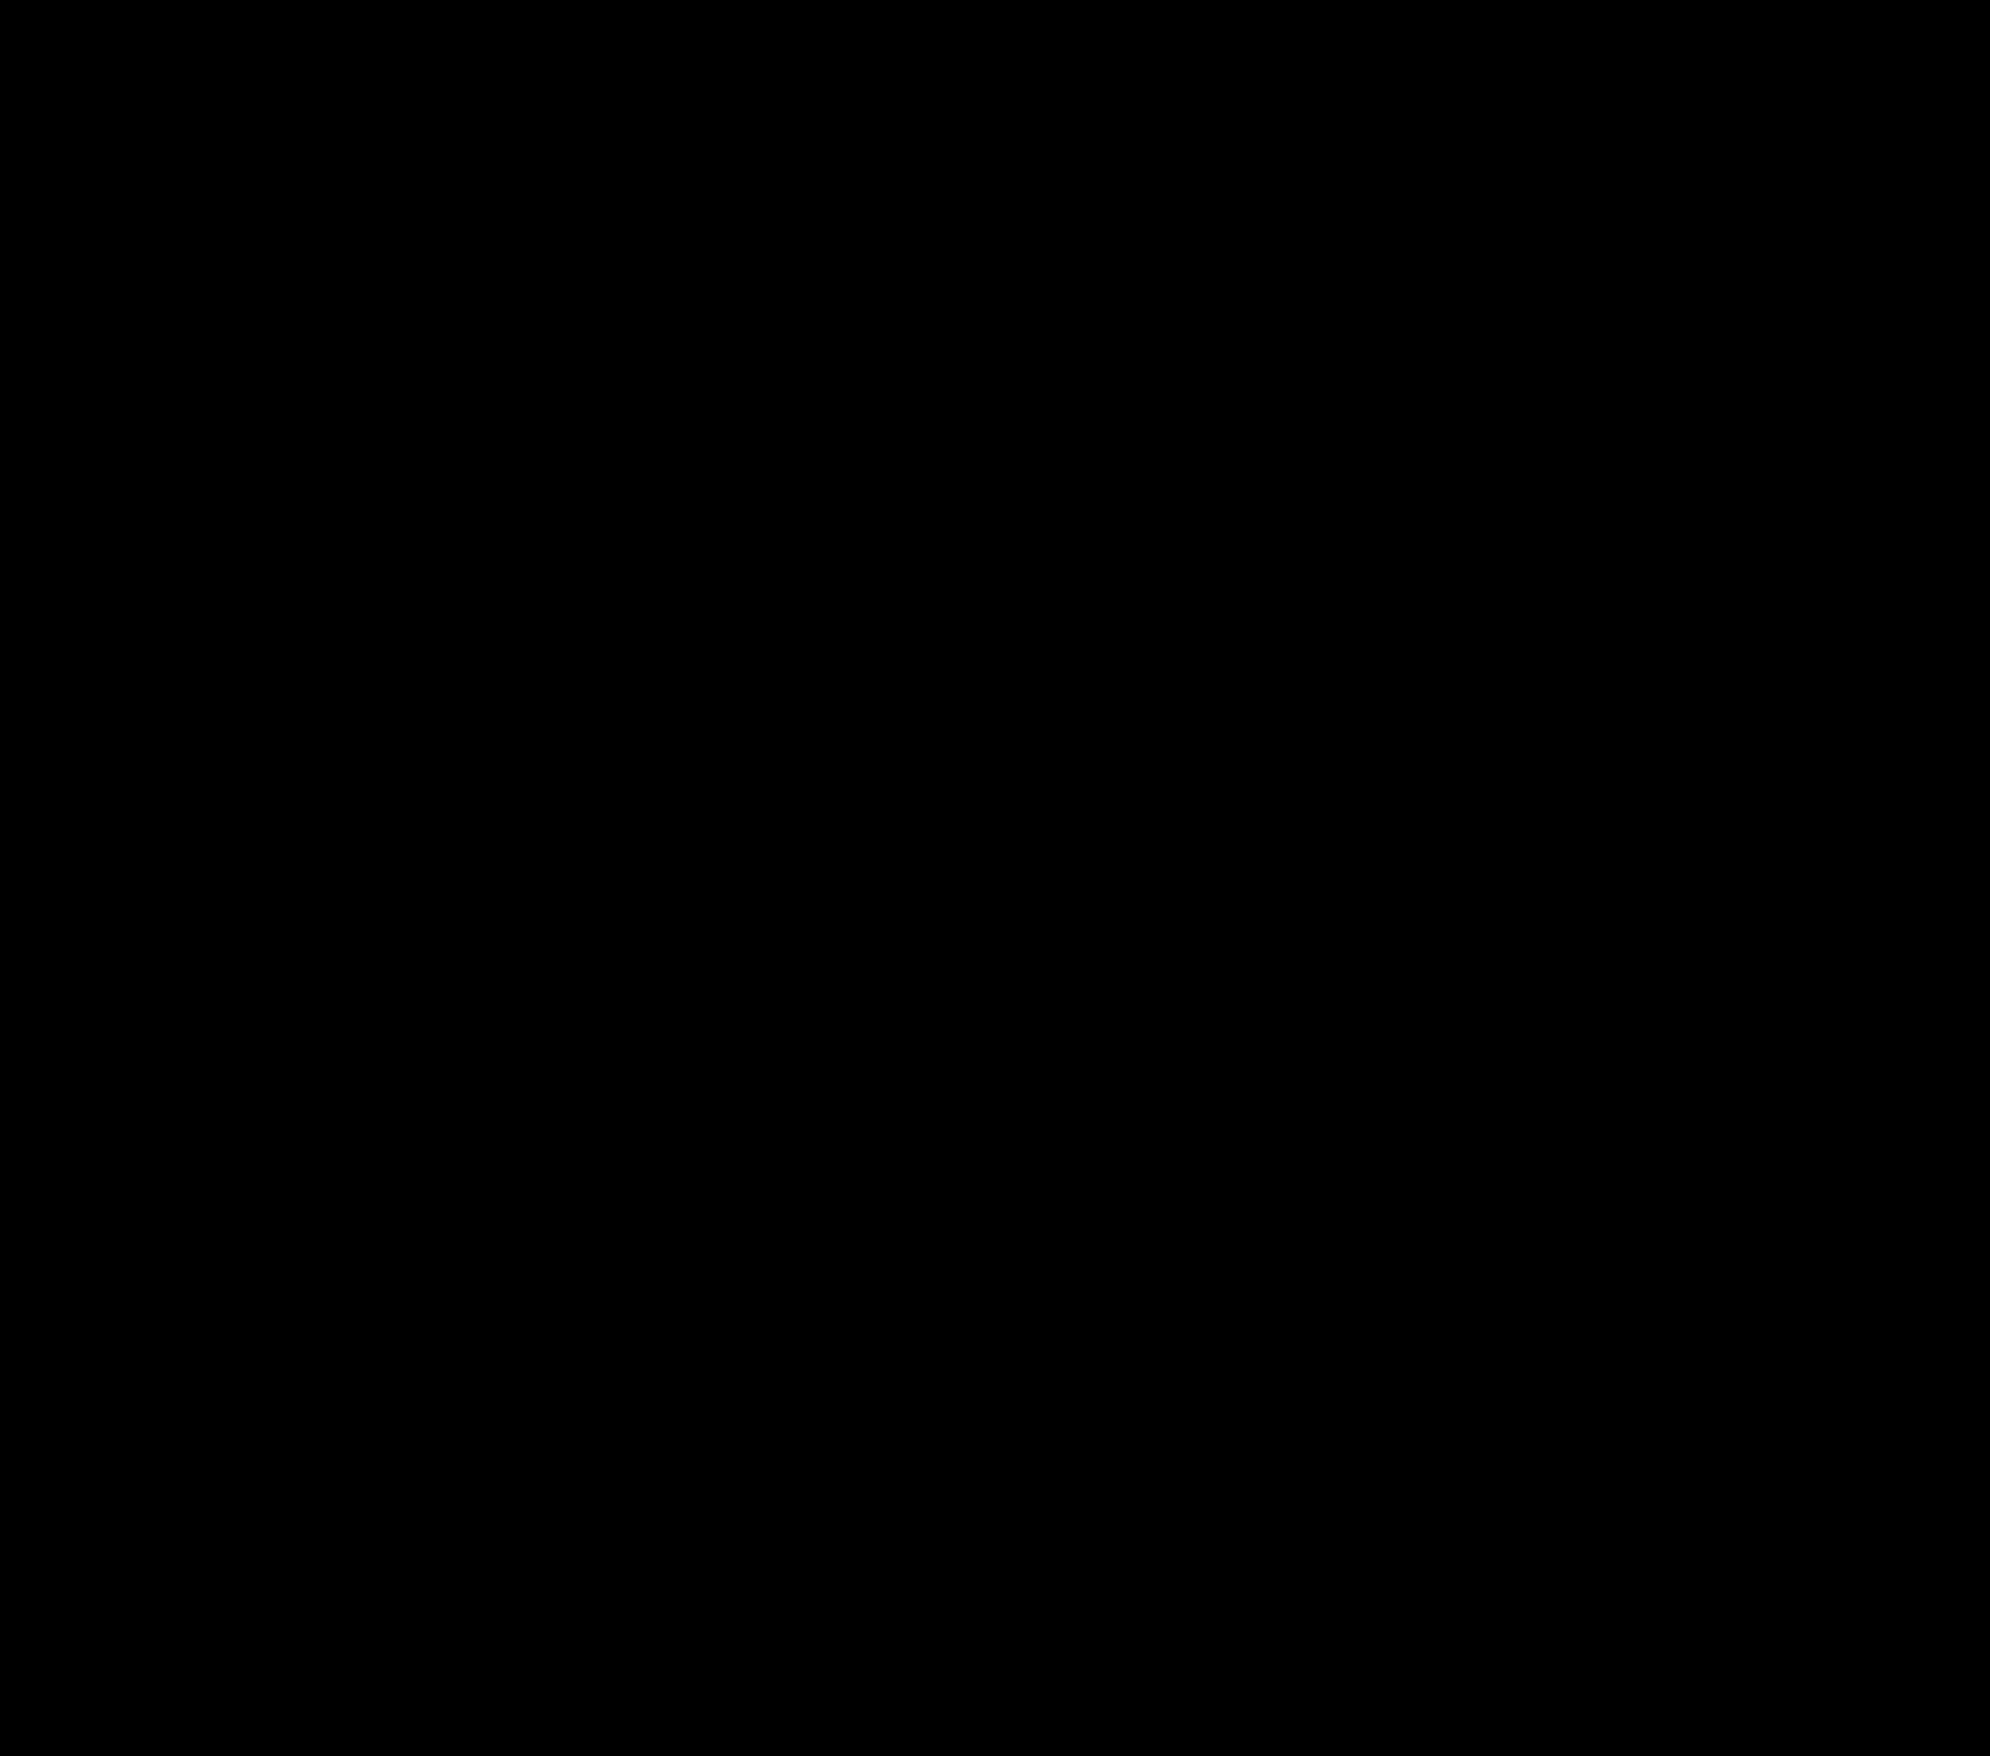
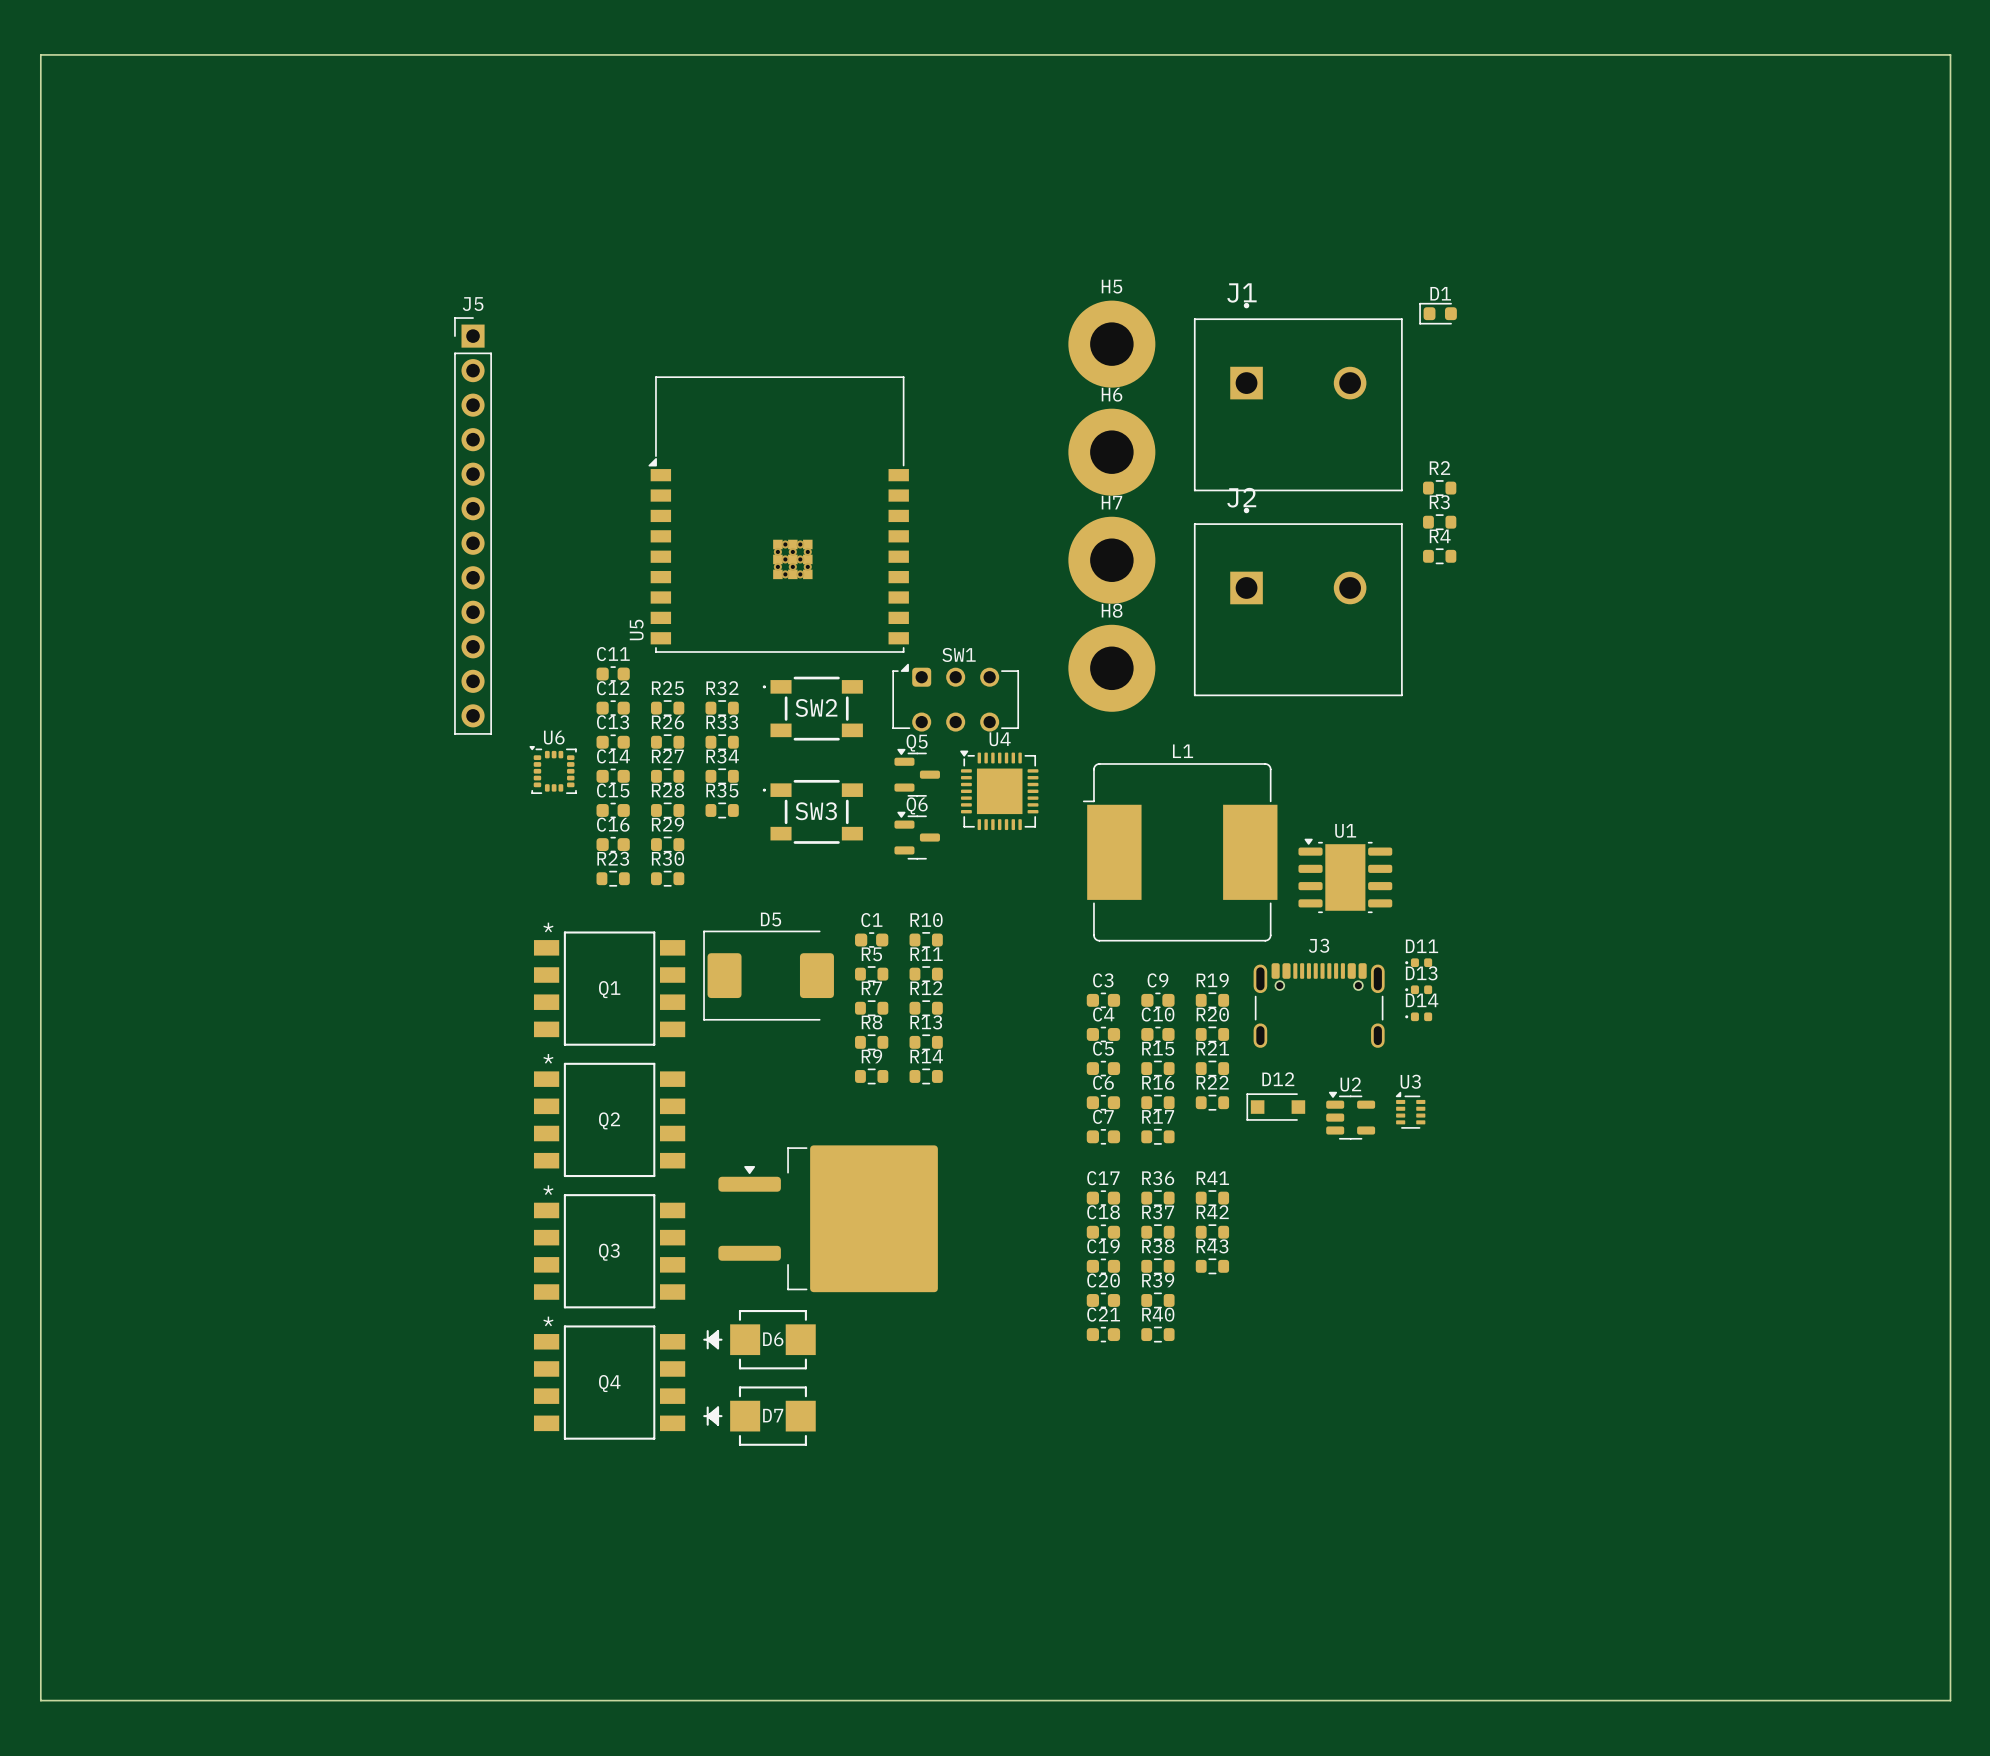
board edge: none -> (40, 54) (1950, 54) (1950, 1700) (40, 1700) (40, 54)
D1: none -> (1438, 313)
H5: none -> (1111, 344)
J1: none -> (1298, 397)
H6: none -> (1111, 452)
R2: none -> (1439, 488)
U5: none -> (778, 514)
R3: none -> (1439, 522)
J5: none -> (473, 525)
via: none -> (785, 544)
via: none -> (800, 544)
via: none -> (777, 551)
via: none -> (792, 551)
via: none -> (807, 551)
R4: none -> (1439, 556)
via: none -> (785, 559)
via: none -> (800, 559)
H7: none -> (1111, 560)
via: none -> (777, 566)
via: none -> (792, 566)
via: none -> (807, 566)
via: none -> (785, 574)
via: none -> (800, 574)
J2: none -> (1298, 602)
H8: none -> (1111, 668)
C11: none -> (613, 674)
SW1: none -> (955, 697)
C12: none -> (613, 708)
R25: none -> (667, 708)
R32: none -> (722, 708)
SW2: none -> (812, 708)
C13: none -> (613, 742)
R26: none -> (667, 742)
R33: none -> (722, 742)
U6: none -> (553, 769)
Q5: none -> (917, 772)
C14: none -> (613, 776)
R27: none -> (667, 776)
R34: none -> (722, 776)
U4: none -> (999, 790)
C15: none -> (613, 810)
R28: none -> (667, 810)
R35: none -> (722, 810)
SW3: none -> (812, 811)
Q6: none -> (917, 835)
C16: none -> (613, 844)
R29: none -> (667, 844)
L1: none -> (1180, 852)
U1: none -> (1345, 875)
R23: none -> (613, 878)
R30: none -> (667, 878)
C1: none -> (871, 940)
R10: none -> (926, 940)
D11: none -> (1418, 962)
R5: none -> (871, 974)
R11: none -> (926, 974)
D5: none -> (768, 975)
Q1: none -> (609, 988)
D13: none -> (1418, 989)
C3: none -> (1103, 1000)
C9: none -> (1157, 1000)
R19: none -> (1212, 1000)
J3: none -> (1319, 1005)
R7: none -> (871, 1008)
R12: none -> (926, 1008)
D14: none -> (1418, 1016)
C4: none -> (1103, 1034)
C10: none -> (1157, 1034)
R20: none -> (1212, 1034)
R8: none -> (871, 1042)
R13: none -> (926, 1042)
C5: none -> (1103, 1068)
R15: none -> (1157, 1068)
R21: none -> (1212, 1068)
R9: none -> (871, 1076)
R14: none -> (926, 1076)
C6: none -> (1103, 1102)
R16: none -> (1157, 1102)
R22: none -> (1212, 1102)
D12: none -> (1275, 1107)
U3: none -> (1410, 1110)
U2: none -> (1350, 1115)
Q2: none -> (609, 1119)
C7: none -> (1103, 1136)
R17: none -> (1157, 1136)
C17: none -> (1103, 1198)
R36: none -> (1157, 1198)
R41: none -> (1212, 1198)
part: none -> (828, 1218)
C18: none -> (1103, 1232)
R37: none -> (1157, 1232)
R42: none -> (1212, 1232)
Q3: none -> (609, 1251)
C19: none -> (1103, 1266)
R38: none -> (1157, 1266)
R43: none -> (1212, 1266)
C20: none -> (1103, 1300)
R39: none -> (1157, 1300)
C21: none -> (1103, 1334)
R40: none -> (1157, 1334)
D6: none -> (759, 1339)
Q4: none -> (609, 1382)
D7: none -> (759, 1416)

